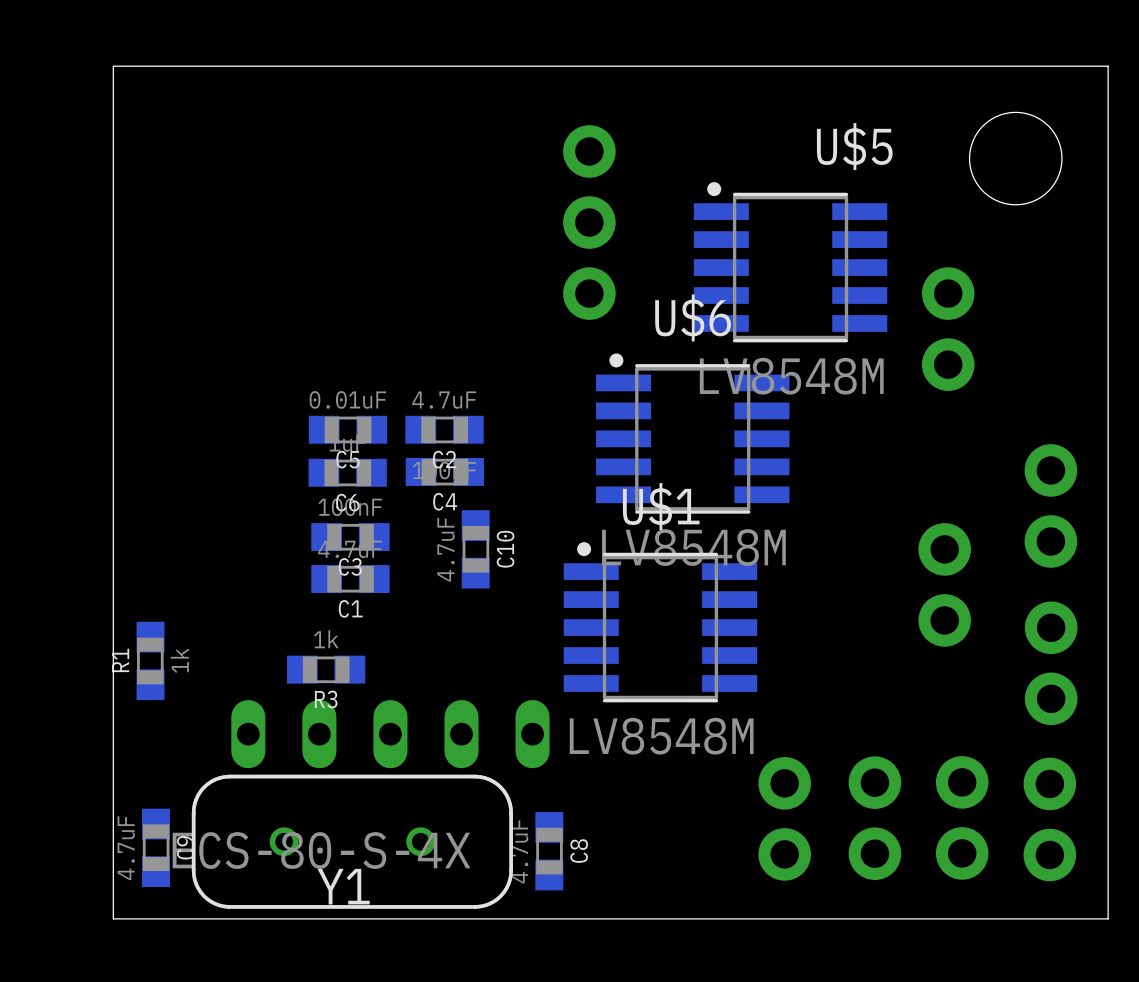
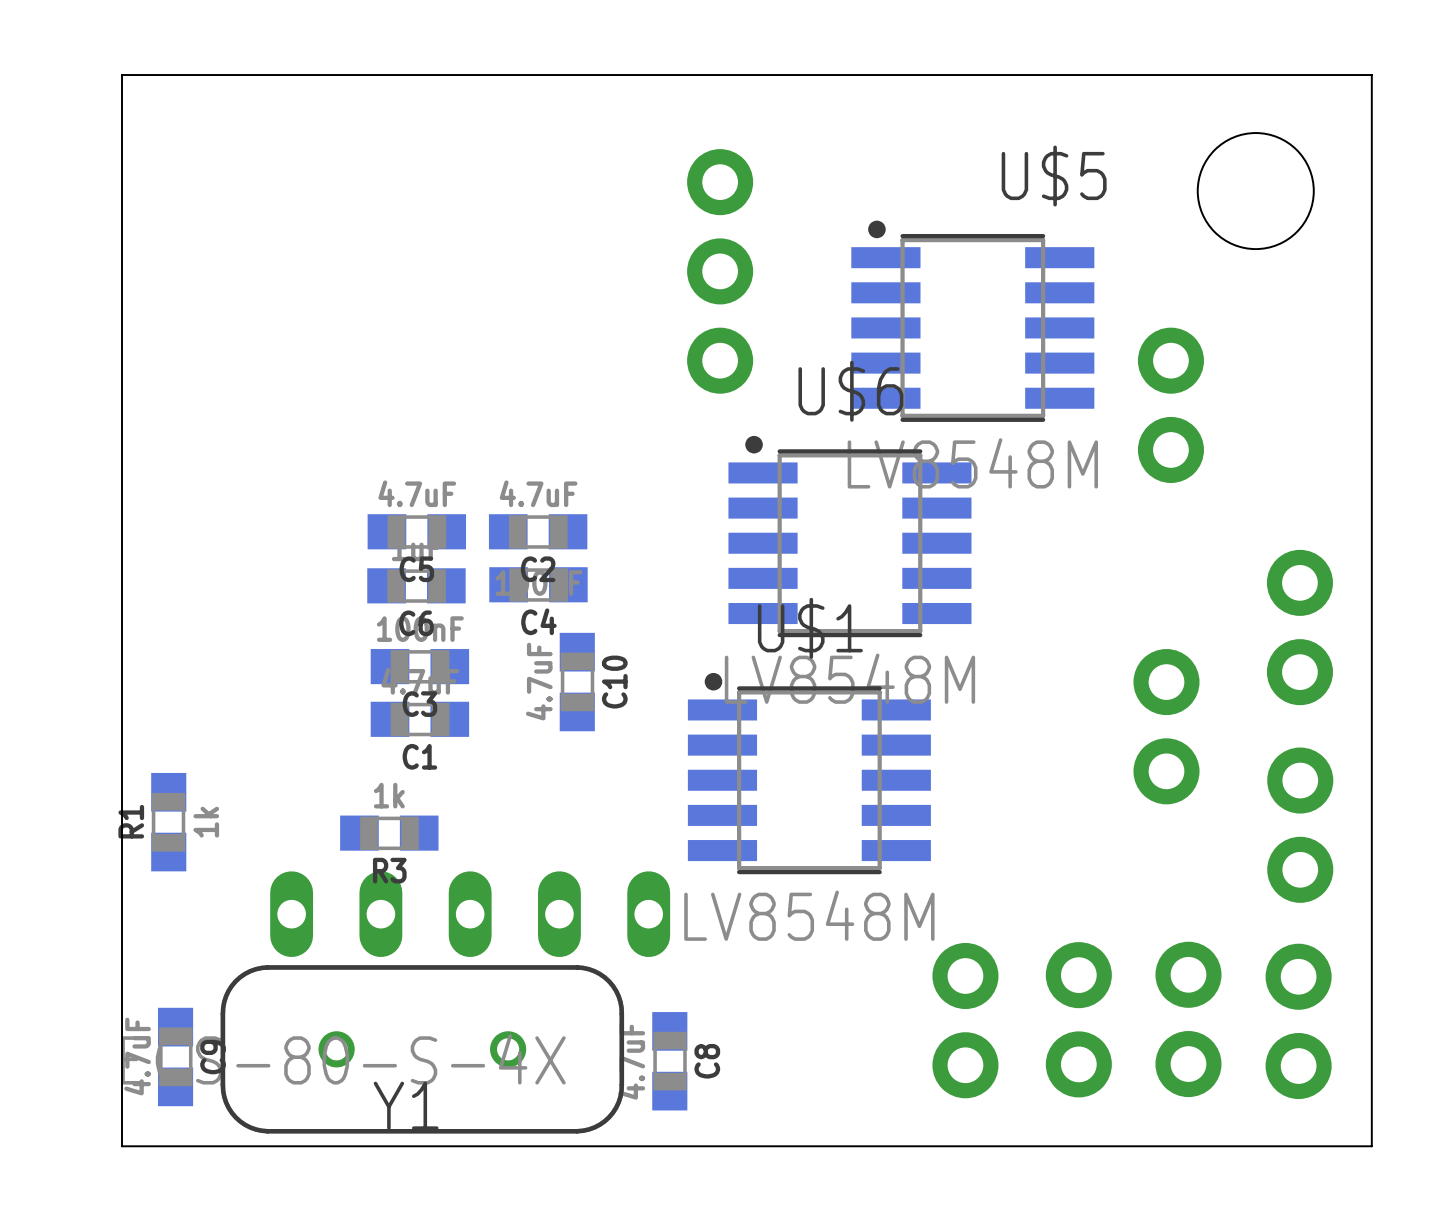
C5 value: 0.01uF (347, 399) -> 4.7uF (417, 493)

